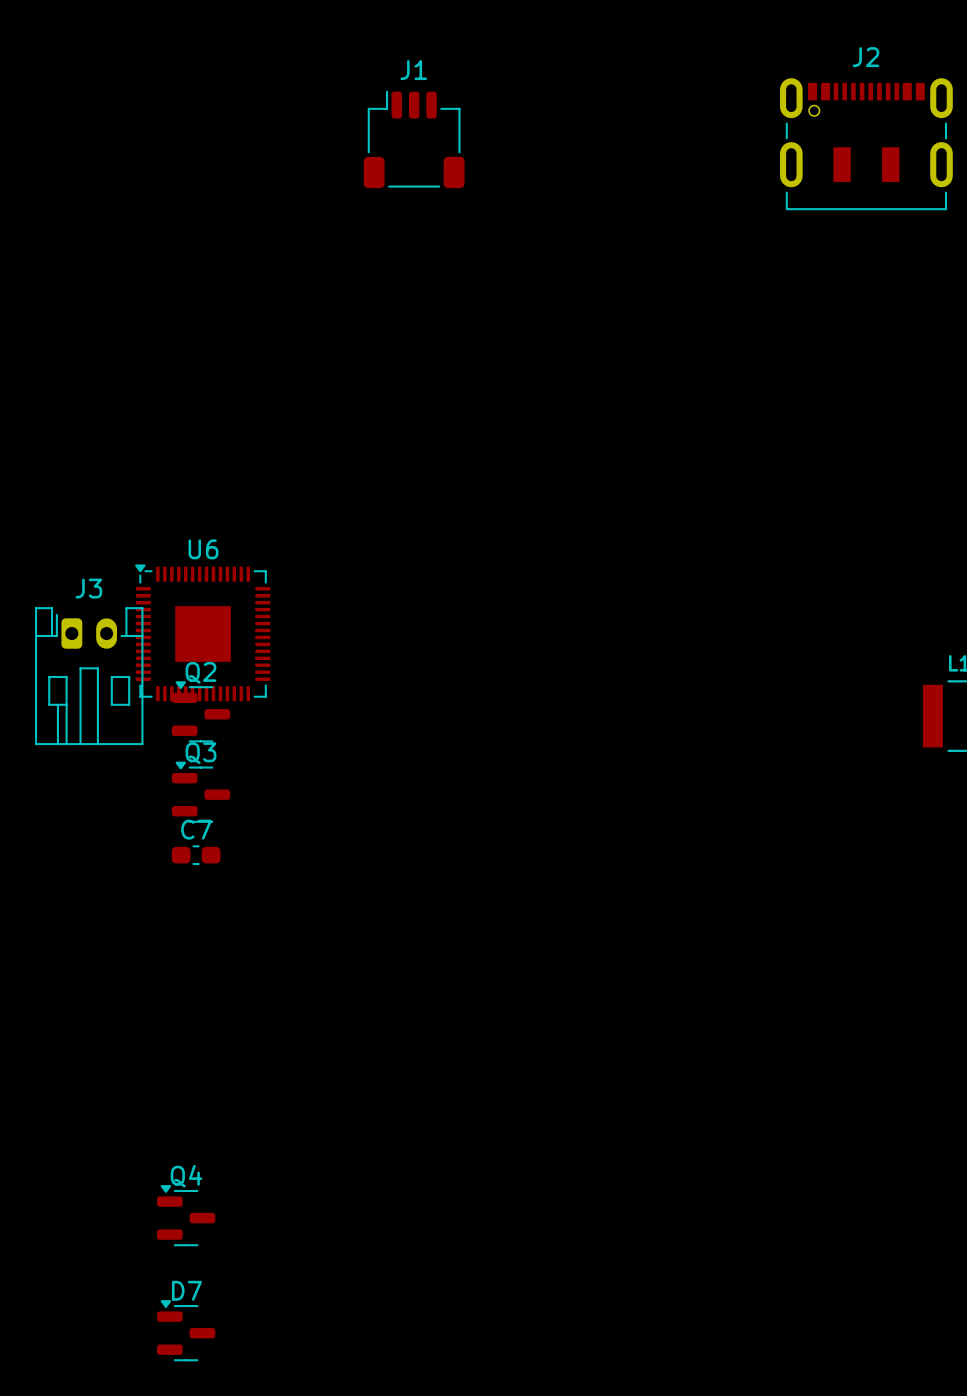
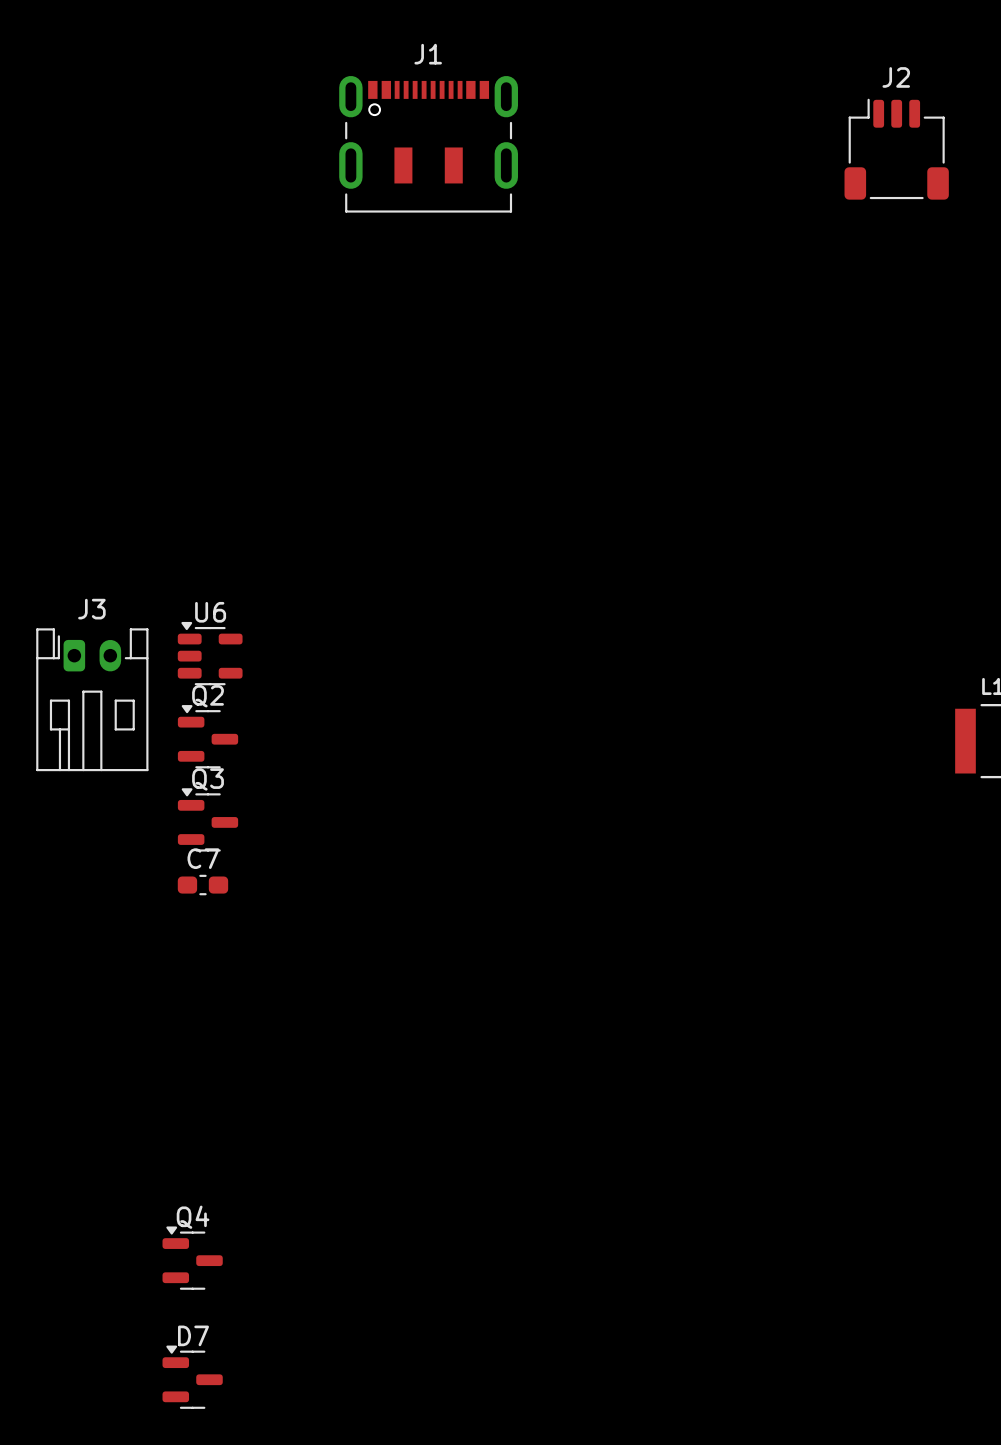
J2 footprint: [780, 78, 953, 211] -> [844, 98, 949, 200]
J1 footprint: [363, 90, 465, 189] -> [339, 75, 519, 213]
U6 name position: U6 (203, 549) -> U6 (210, 612)
U6 footprint: [135, 564, 271, 702] -> [177, 621, 243, 686]

